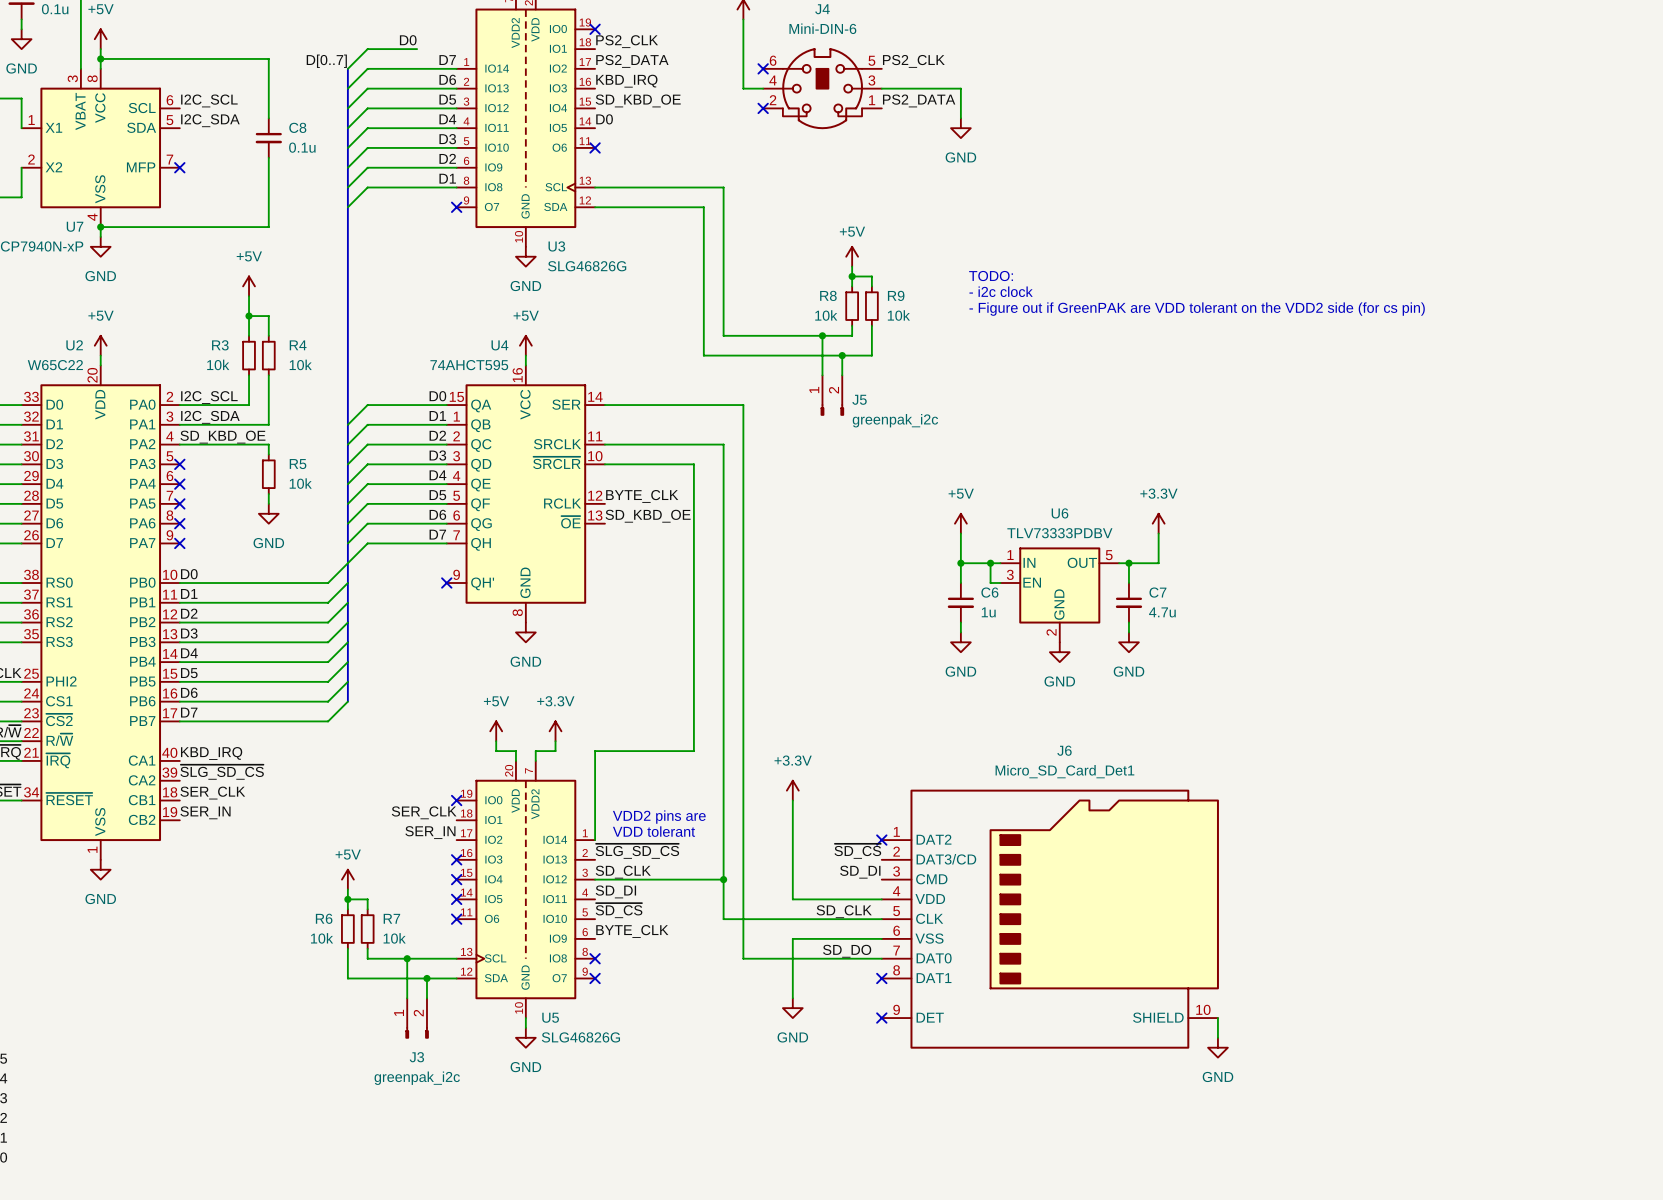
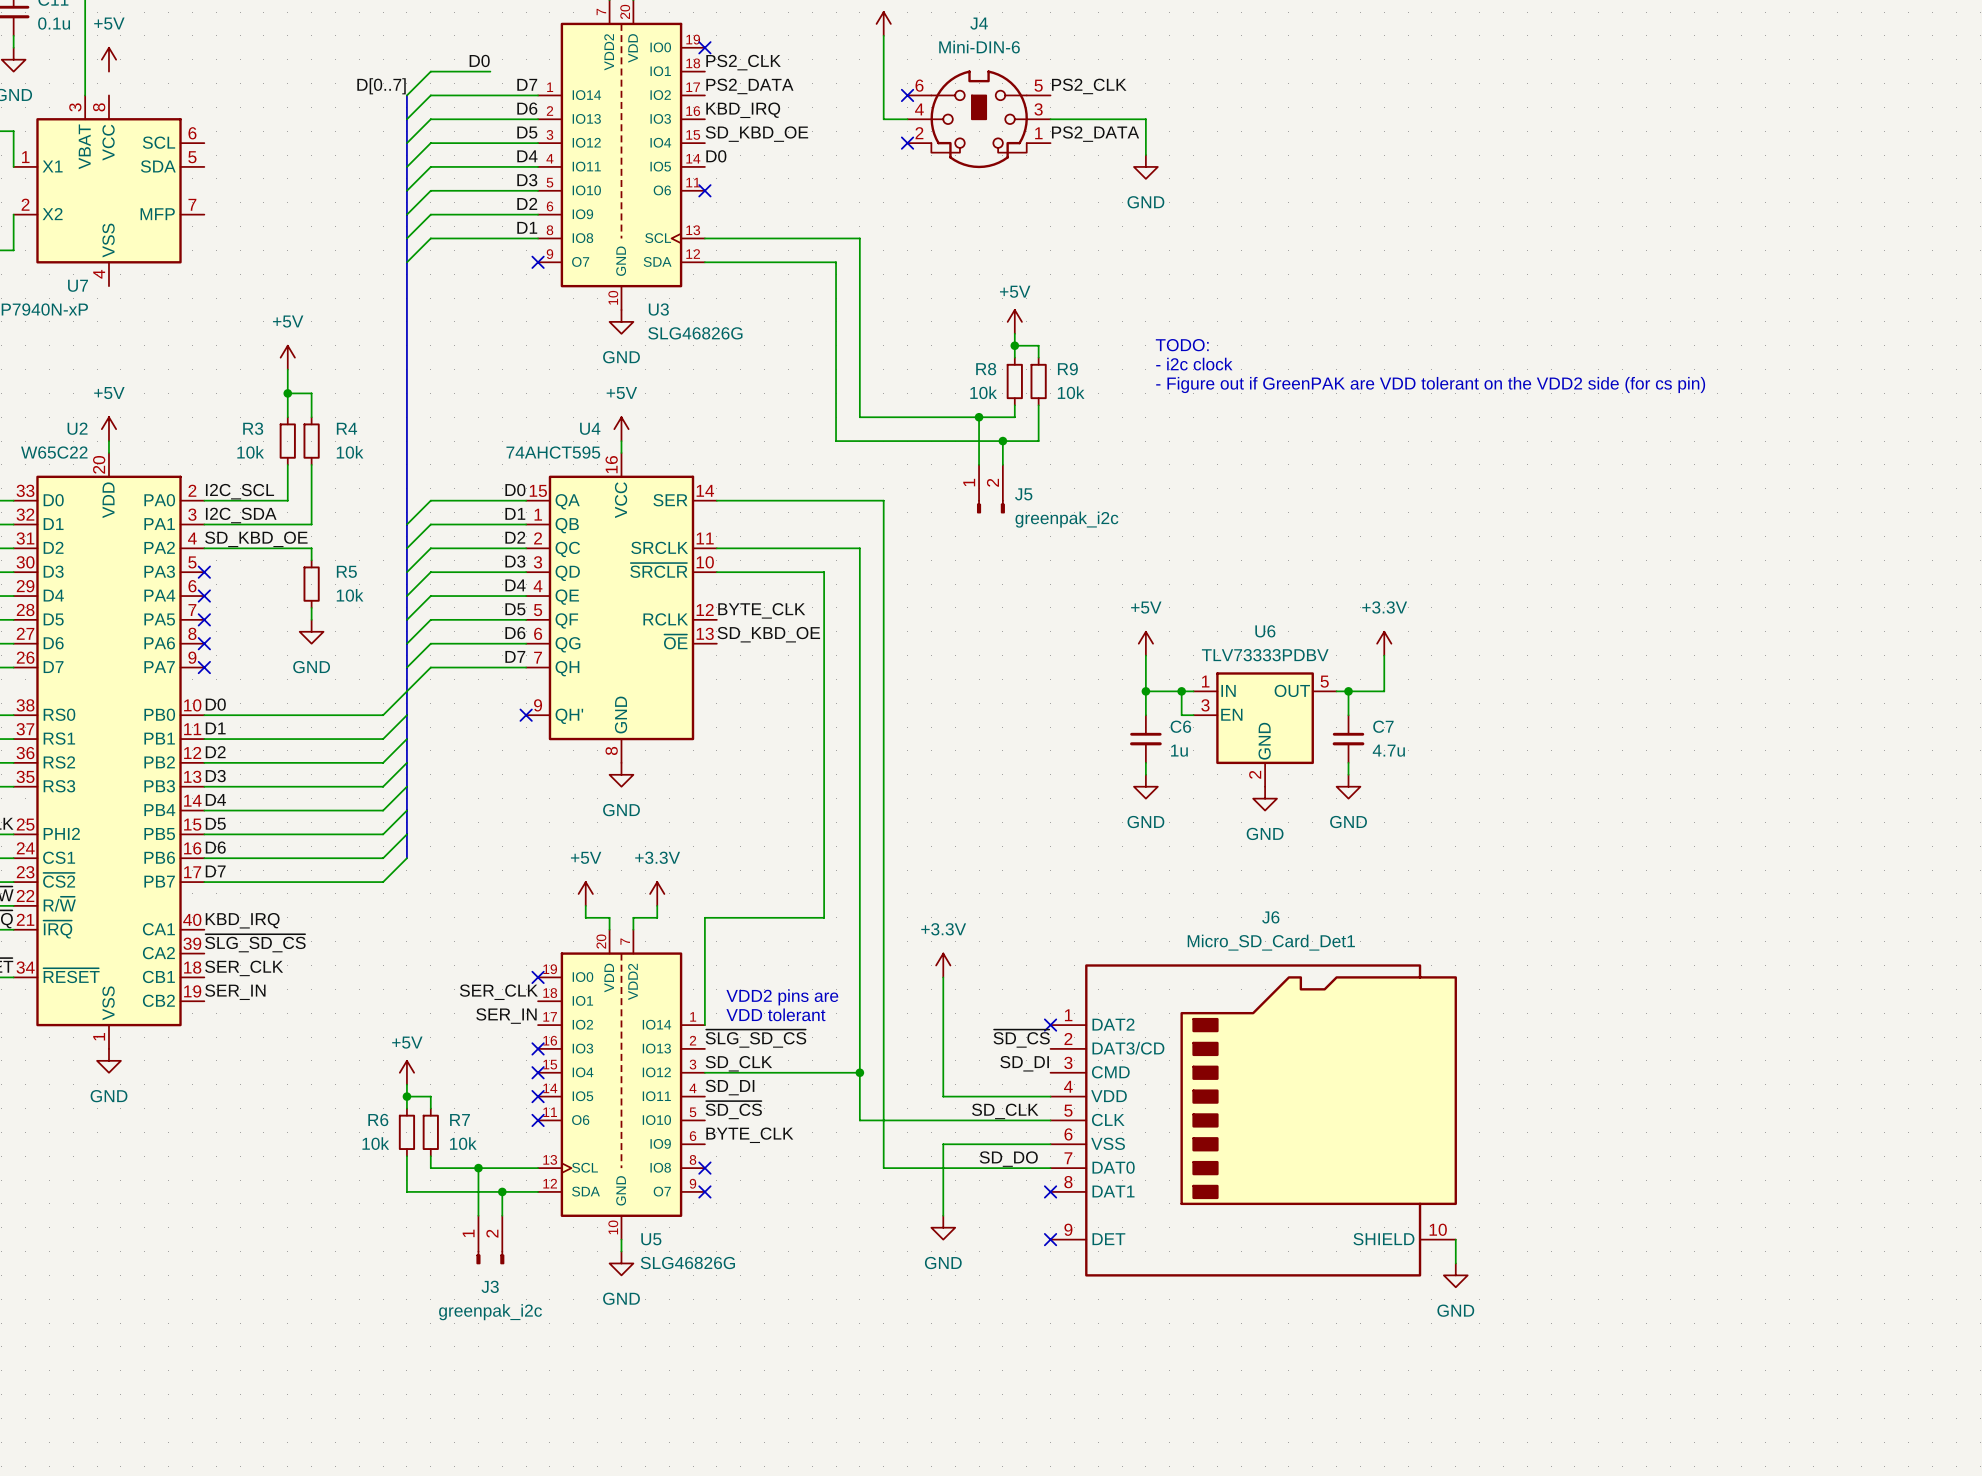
wire: (100, 49) (100, 68) -> none
wire: (100, 58) (268, 58) (268, 118) -> none
junction: (100, 58) -> none
label: I2C_SCL (209, 100) -> none
label: I2C_SDA (210, 120) -> none
C8: 0.1u (268, 138) -> none
wire: (268, 157) (268, 227) (100, 227) (100, 236) -> none
no-connect mark: (179, 167) -> none
junction: (100, 227) -> none
power symbol: GND (100, 246) -> none

